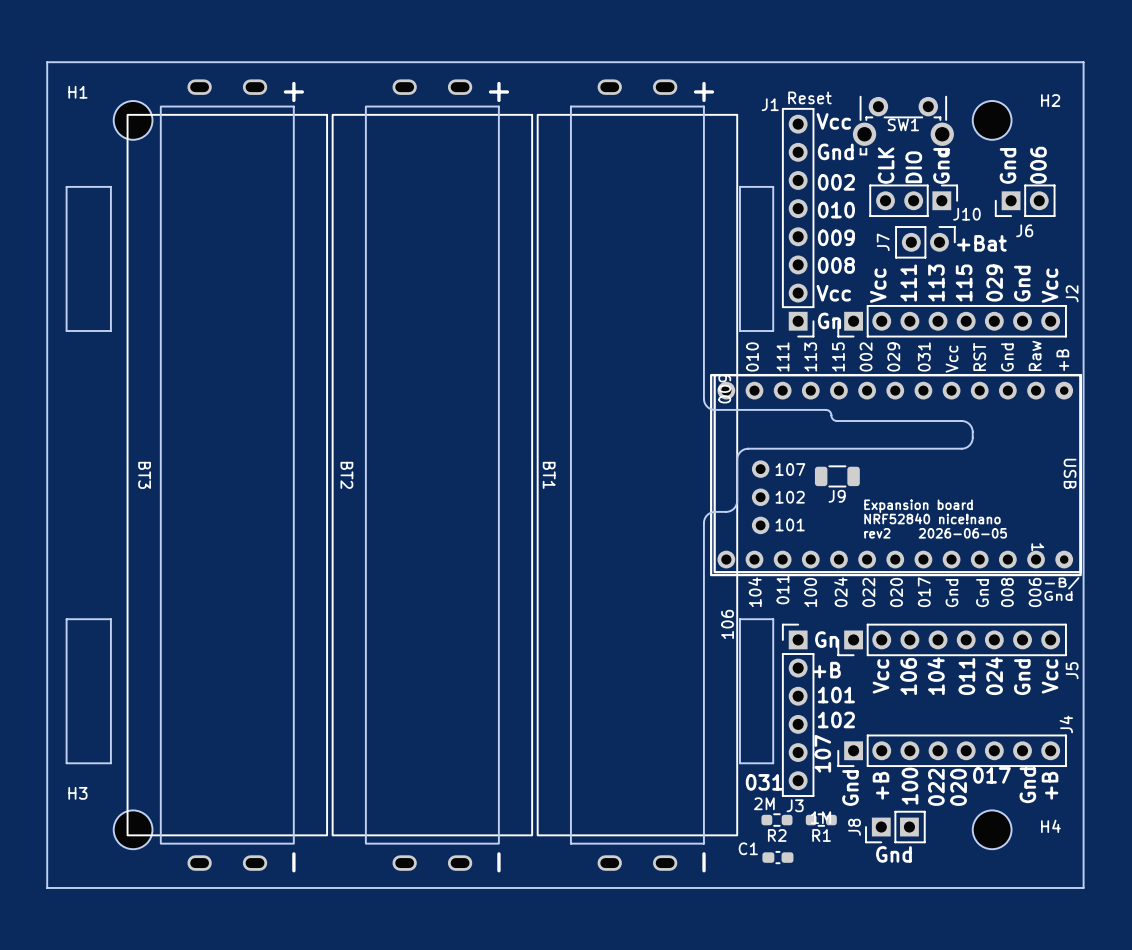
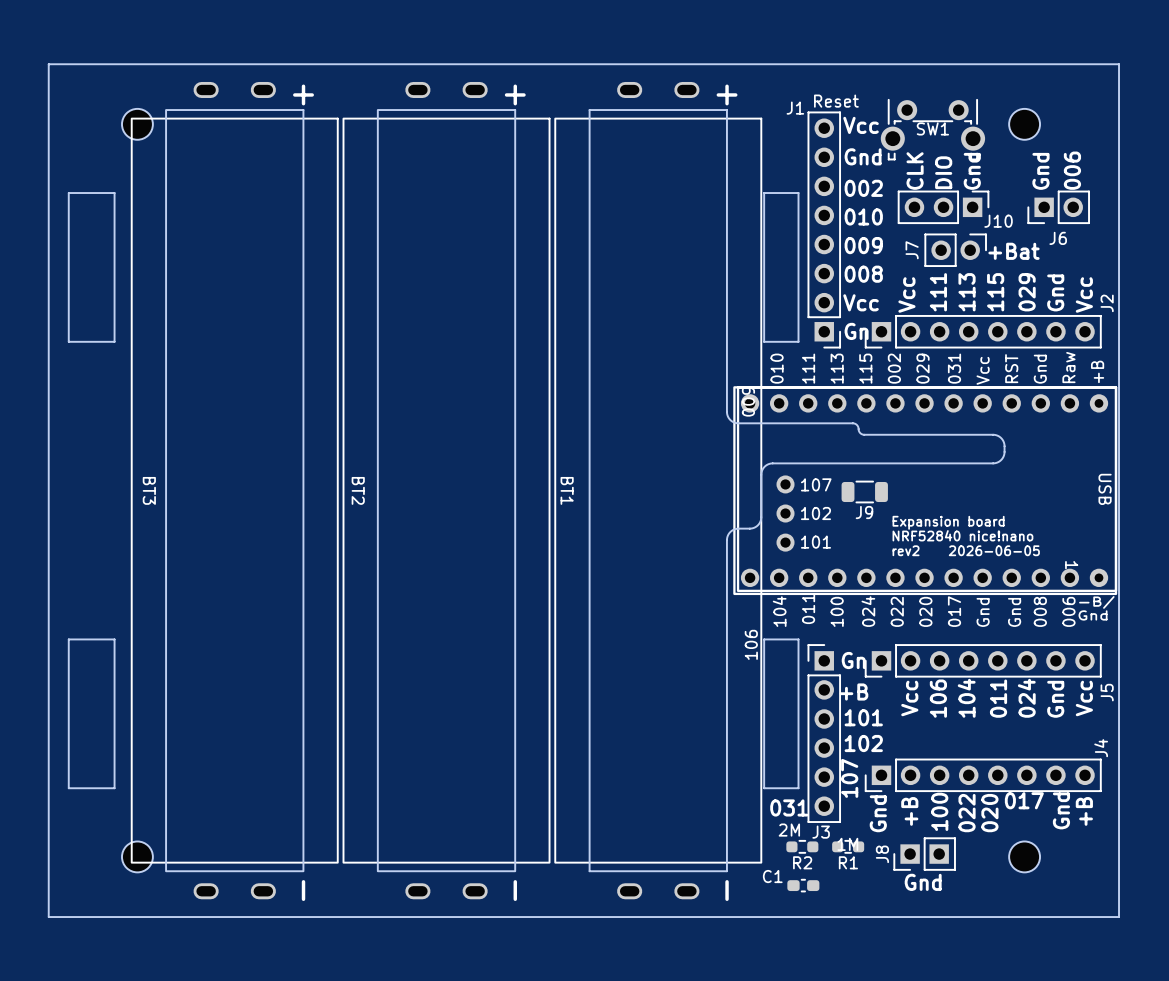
H1: (133, 120) -> none
part: none -> (137, 124)
H2: (992, 120) -> none
part: none -> (1024, 124)
H3: (133, 829) -> none
part: none -> (137, 856)
H4: (992, 829) -> none
part: none -> (1024, 856)

